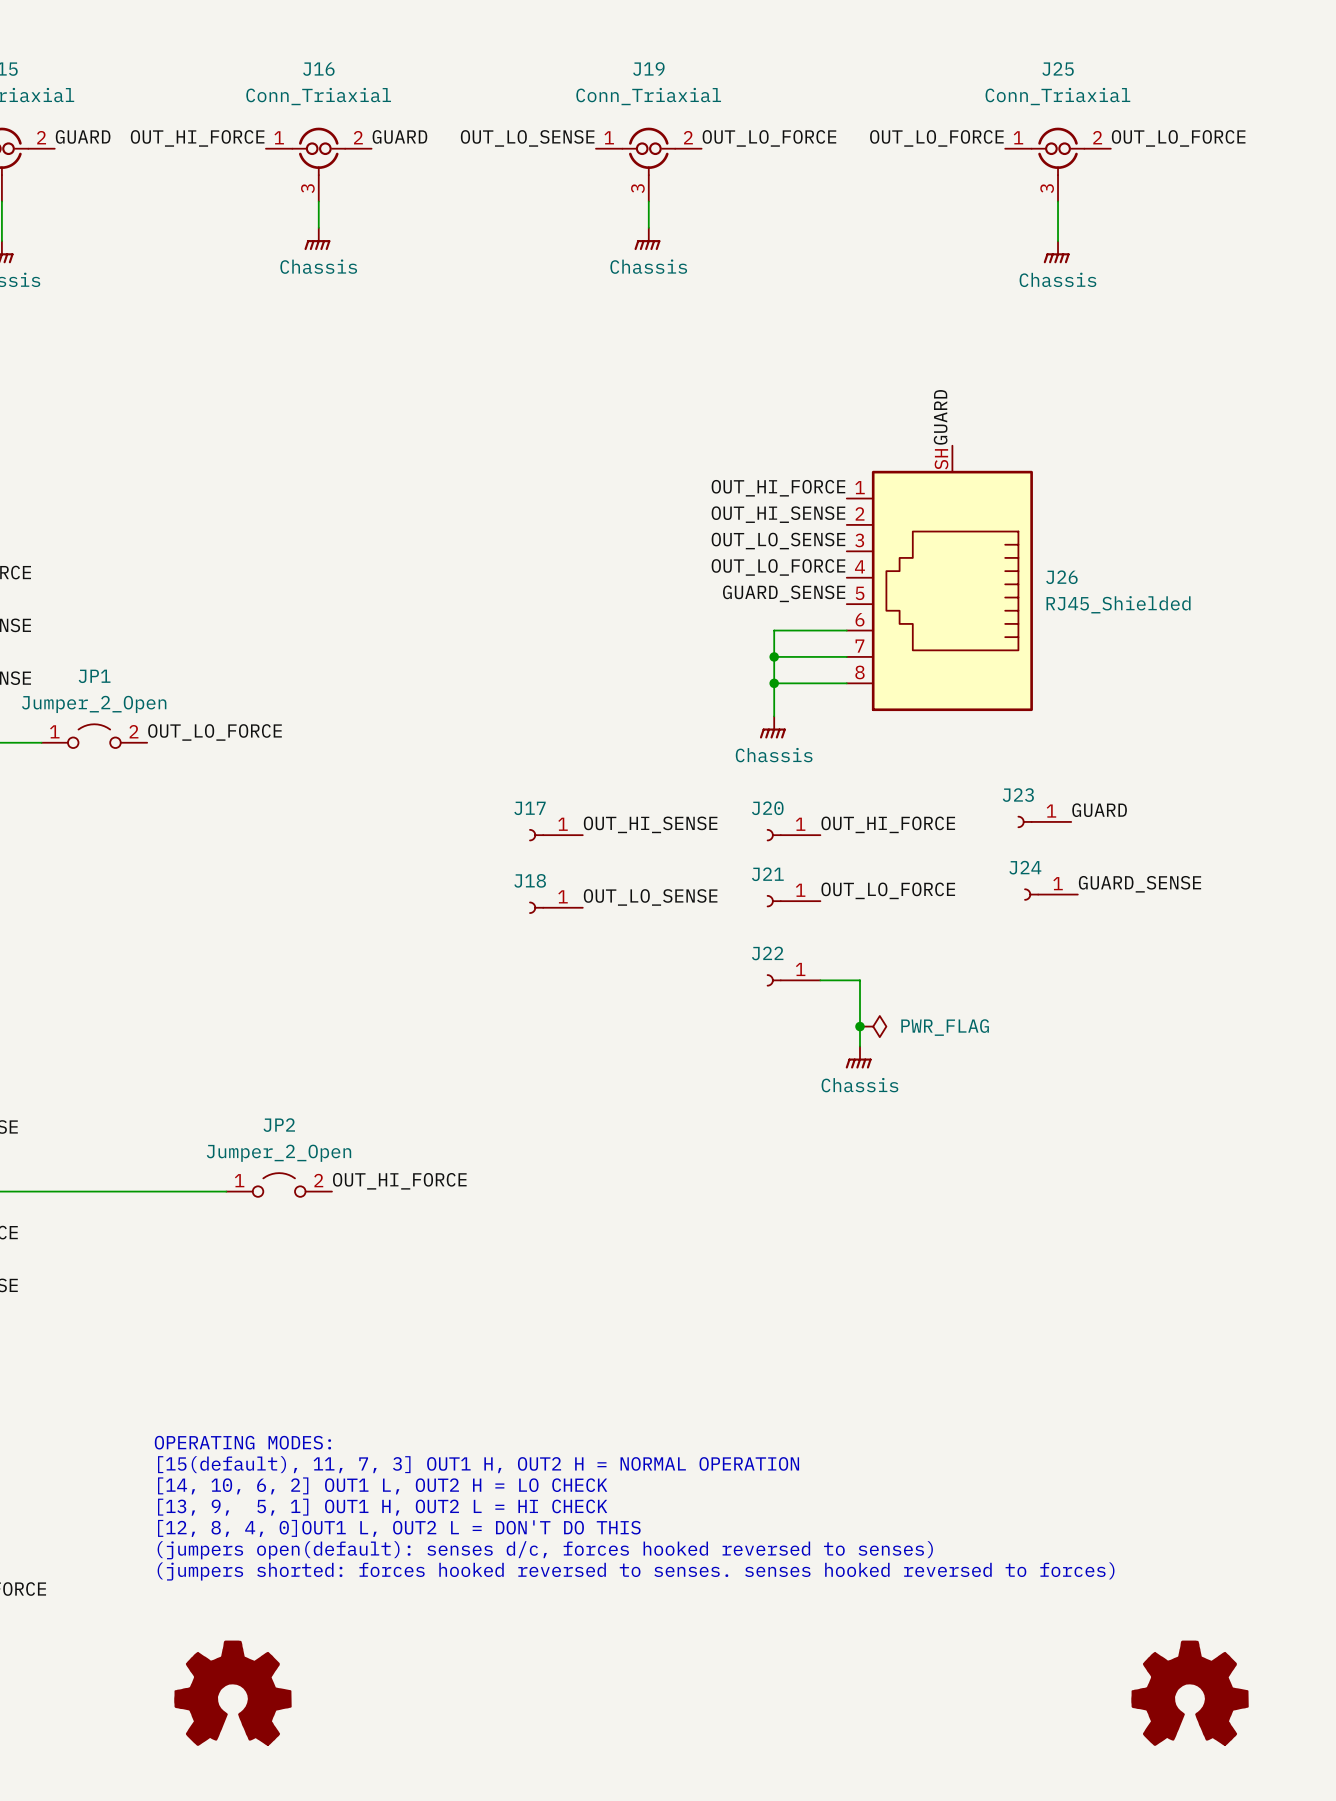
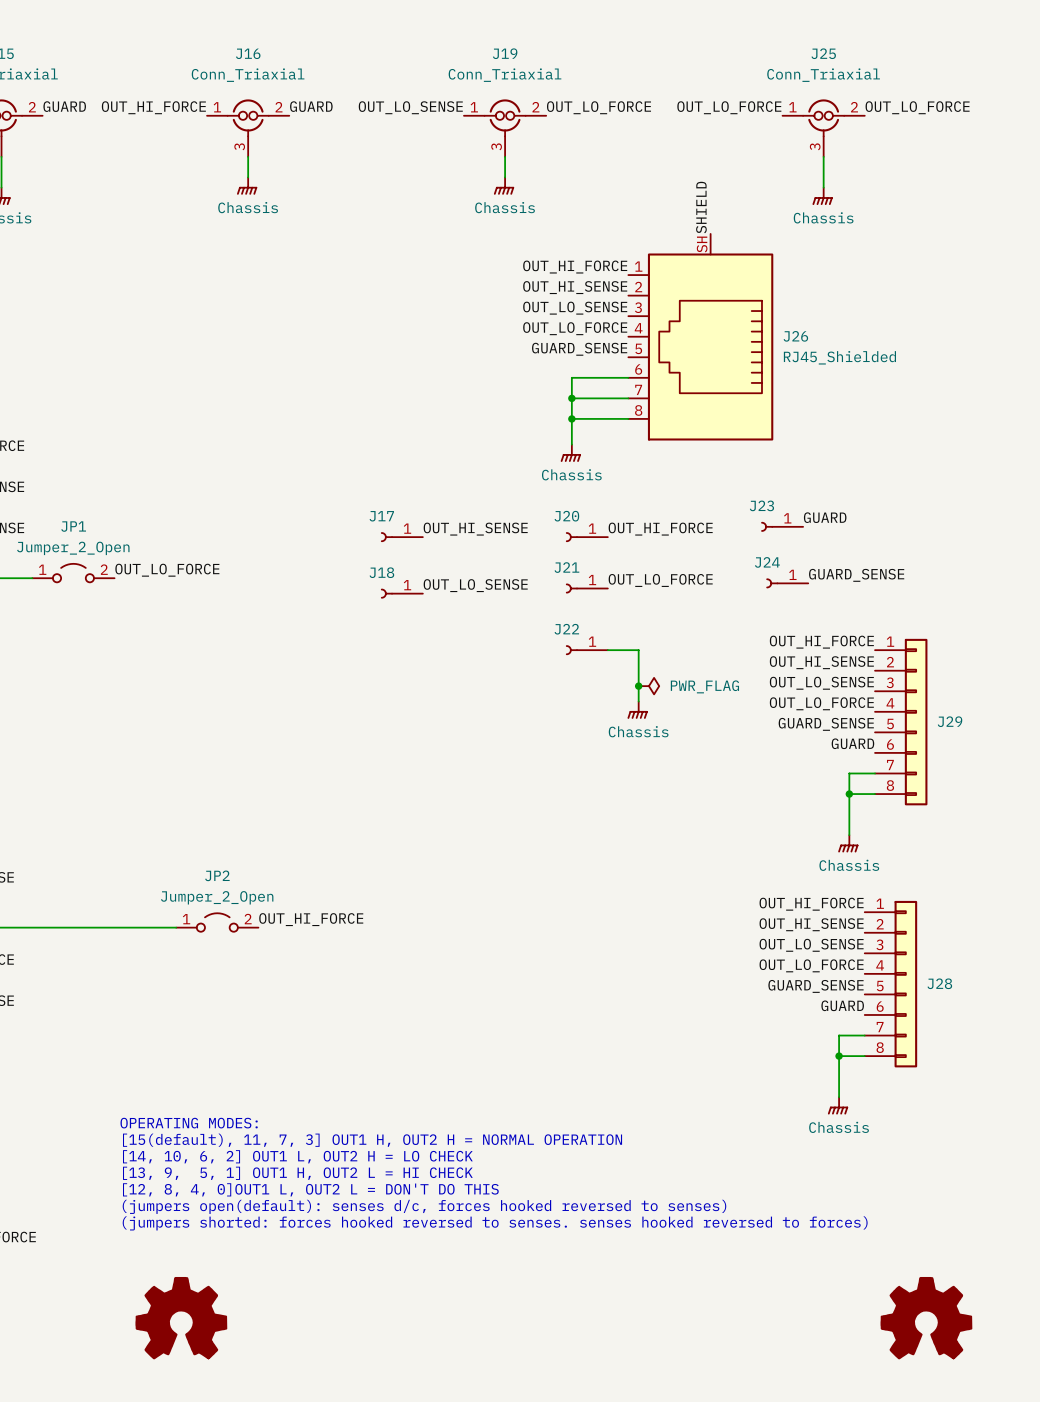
label: none -> SHIELD (701, 207)
label: none -> OUT_HI_FORCE (575, 267)
label: GUARD (940, 417) -> none
label: none -> OUT_LO_FORCE (575, 328)
label: none -> GUARD_SENSE (579, 349)
label: OUT_HI_FORCE (778, 488) -> none
junction: none -> (571, 398)
label position: OUT_HI_SENSE (778, 514) -> OUT_HI_SENSE (575, 287)
junction: none -> (571, 418)
label position: OUT_LO_SENSE (778, 541) -> OUT_LO_SENSE (575, 308)
label: OUT_LO_FORCE (778, 567) -> none
J26 position: (939, 578) -> (700, 337)
power symbol: none -> (570, 453)
label: GUARD_SENSE (784, 593) -> none
wire: (846, 630) (774, 630) (774, 716) -> (628, 377) (571, 377) (571, 444)
wire: (774, 656) (846, 656) -> (571, 398) (628, 398)
junction: (774, 656) -> none
label: none -> GUARD (825, 517)
label: none -> OUT_HI_FORCE (660, 529)
wire: (774, 683) (846, 683) -> (571, 418) (628, 418)
junction: (774, 683) -> none
power symbol: (772, 727) -> none
label: none -> GUARD_SENSE (856, 575)
label: none -> OUT_LO_FORCE (660, 580)
label: GUARD (1099, 810) -> none
J23 position: (1044, 821) -> (782, 526)
label position: OUT_HI_SENSE (650, 824) -> OUT_HI_SENSE (475, 529)
label: OUT_HI_FORCE (888, 824) -> none
label: none -> OUT_HI_FORCE (821, 642)
J17 position: (555, 835) -> (401, 537)
J20 position: (793, 835) -> (586, 537)
label: none -> OUT_HI_SENSE (821, 662)
label: none -> OUT_LO_SENSE (821, 683)
junction: none -> (638, 686)
label position: GUARD_SENSE (1140, 884) -> GUARD_SENSE (826, 724)
label: OUT_LO_FORCE (888, 890) -> none
J24 position: (1051, 894) -> (787, 583)
label position: OUT_LO_SENSE (650, 897) -> OUT_LO_SENSE (475, 585)
J21 position: (793, 901) -> (586, 588)
label: none -> OUT_LO_FORCE (821, 703)
J18 position: (555, 907) -> (401, 593)
power symbol: none -> (637, 710)
J29: none -> (901, 722)
label: none -> GUARD (852, 743)
J22 position: (793, 980) -> (586, 650)
wire: (820, 980) (860, 980) (860, 1046) -> (607, 650) (638, 650) (638, 701)
wire: none -> (875, 773) (849, 773) (849, 835)
wire: none -> (849, 794) (875, 794)
junction: none -> (849, 794)
junction: (860, 1026) -> none
power symbol position: PWR_FLAG (873, 1026) -> PWR_FLAG (648, 686)
power symbol: (858, 1057) -> none
power symbol: none -> (848, 843)
label: none -> OUT_HI_FORCE (811, 904)
label: none -> OUT_HI_SENSE (811, 924)
label: none -> OUT_LO_SENSE (811, 945)
label: none -> OUT_LO_FORCE (811, 965)
J28: none -> (890, 984)
label: none -> GUARD_SENSE (815, 986)
label: none -> GUARD (842, 1005)
wire: none -> (864, 1035) (839, 1035) (839, 1097)
wire: none -> (839, 1056) (864, 1056)
junction: none -> (839, 1056)
power symbol: none -> (838, 1105)

